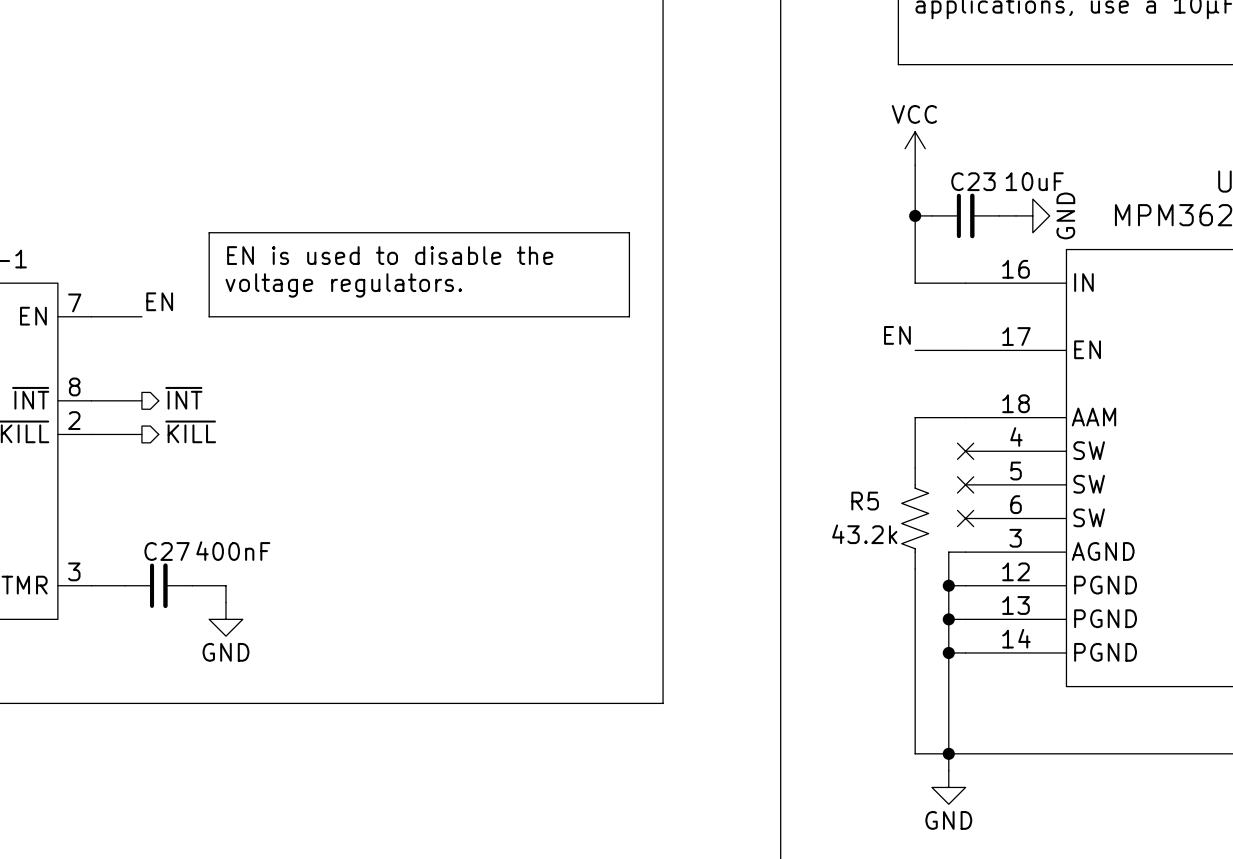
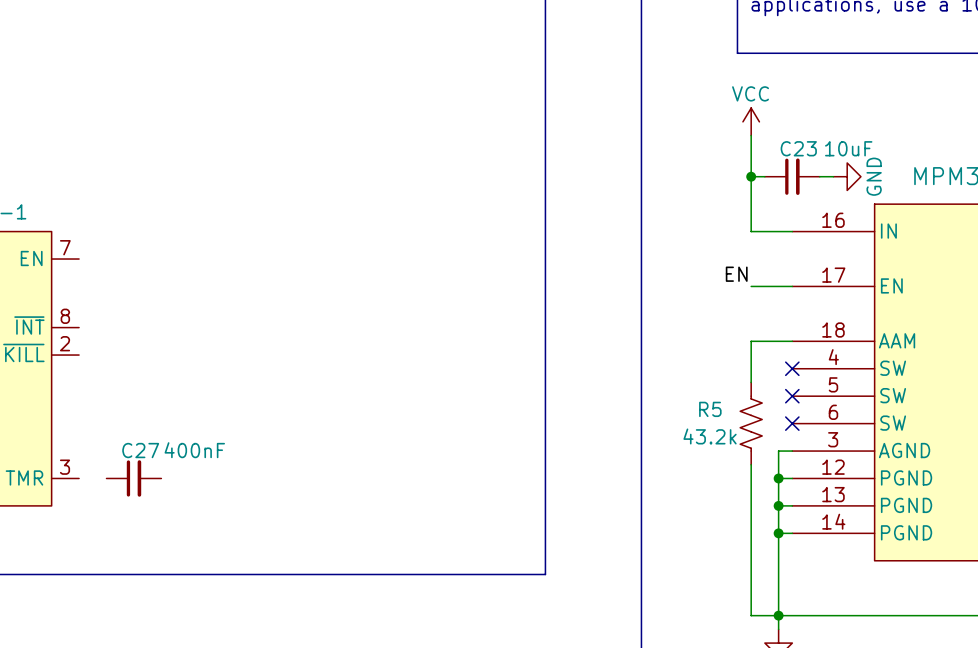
line: (209, 232) (629, 232) (629, 316) (209, 316) (209, 232) -> none
text: EN is used to disable the (390, 255) -> none
text: voltage regulators. (343, 285) -> none
label: EN (159, 301) -> none
wire: (91, 316) (141, 316) -> none
hierarchical label: ~{INT} (183, 398) -> none
wire: (91, 400) (141, 400) -> none
hierarchical label: ~{KILL} (190, 431) -> none
wire: (91, 434) (141, 434) -> none
wire: (91, 585) (125, 585) -> none
wire: (192, 585) (225, 585) (225, 602) -> none
power symbol: GND (225, 619) -> none

